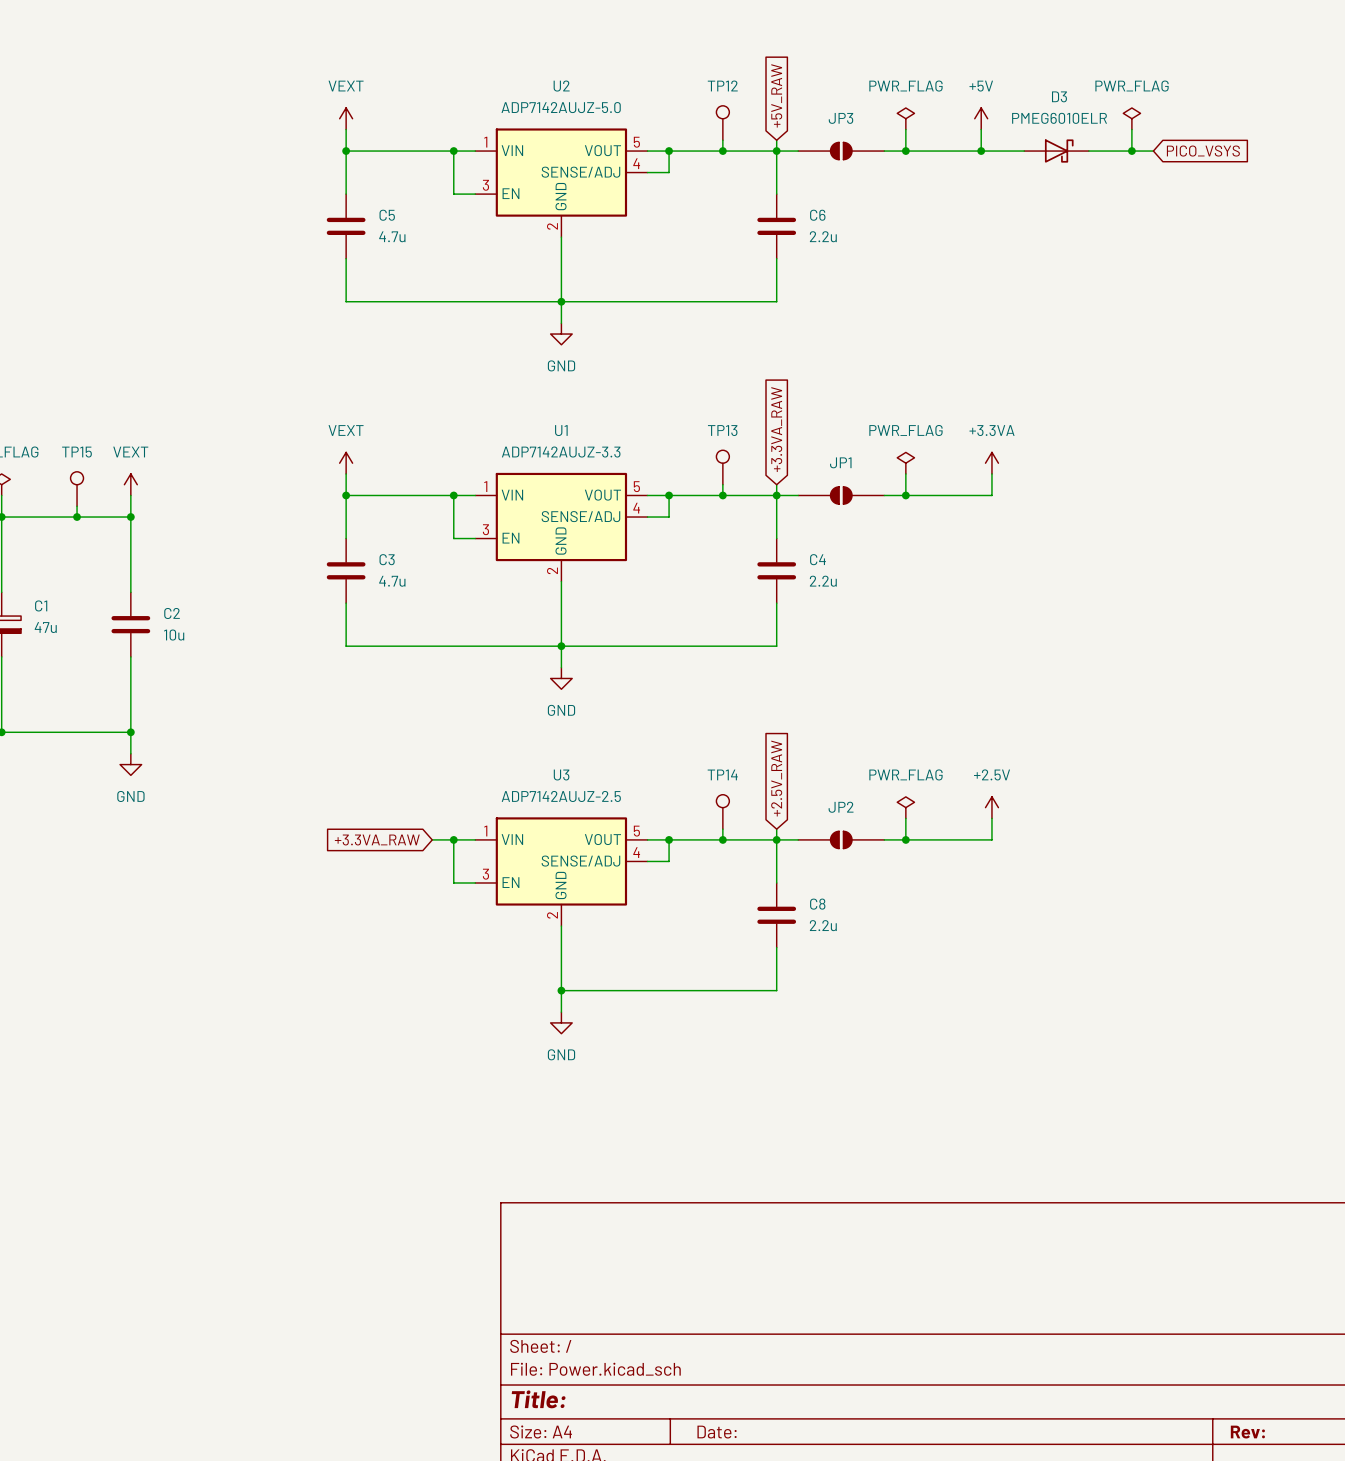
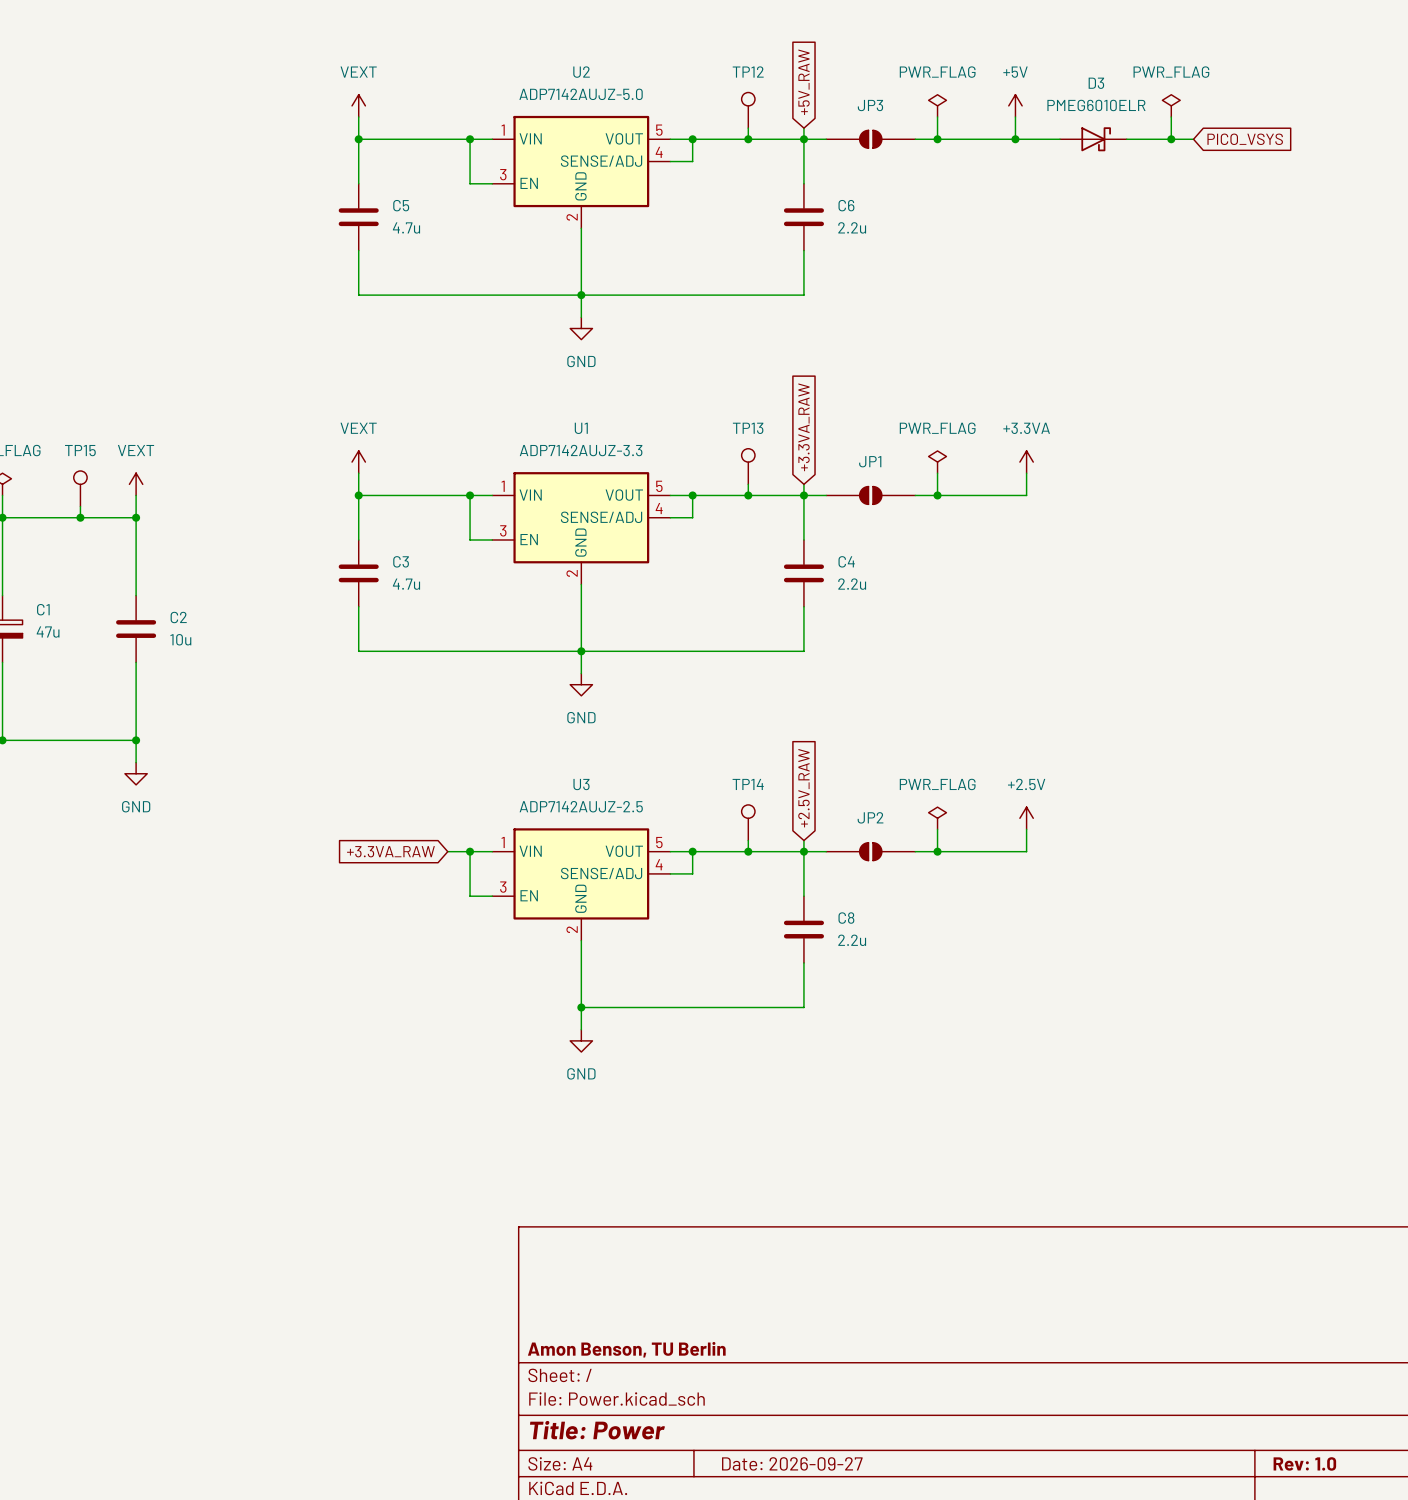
title block: none -> Amon Benson, TU Berlin (626, 1349)
title block: Title: (538, 1399) -> Title: Power (597, 1430)
title block: Date: (717, 1432) -> Date: 2026-09-27 (792, 1463)
title block: Rev: (1247, 1432) -> Rev: 1.0 (1304, 1463)

